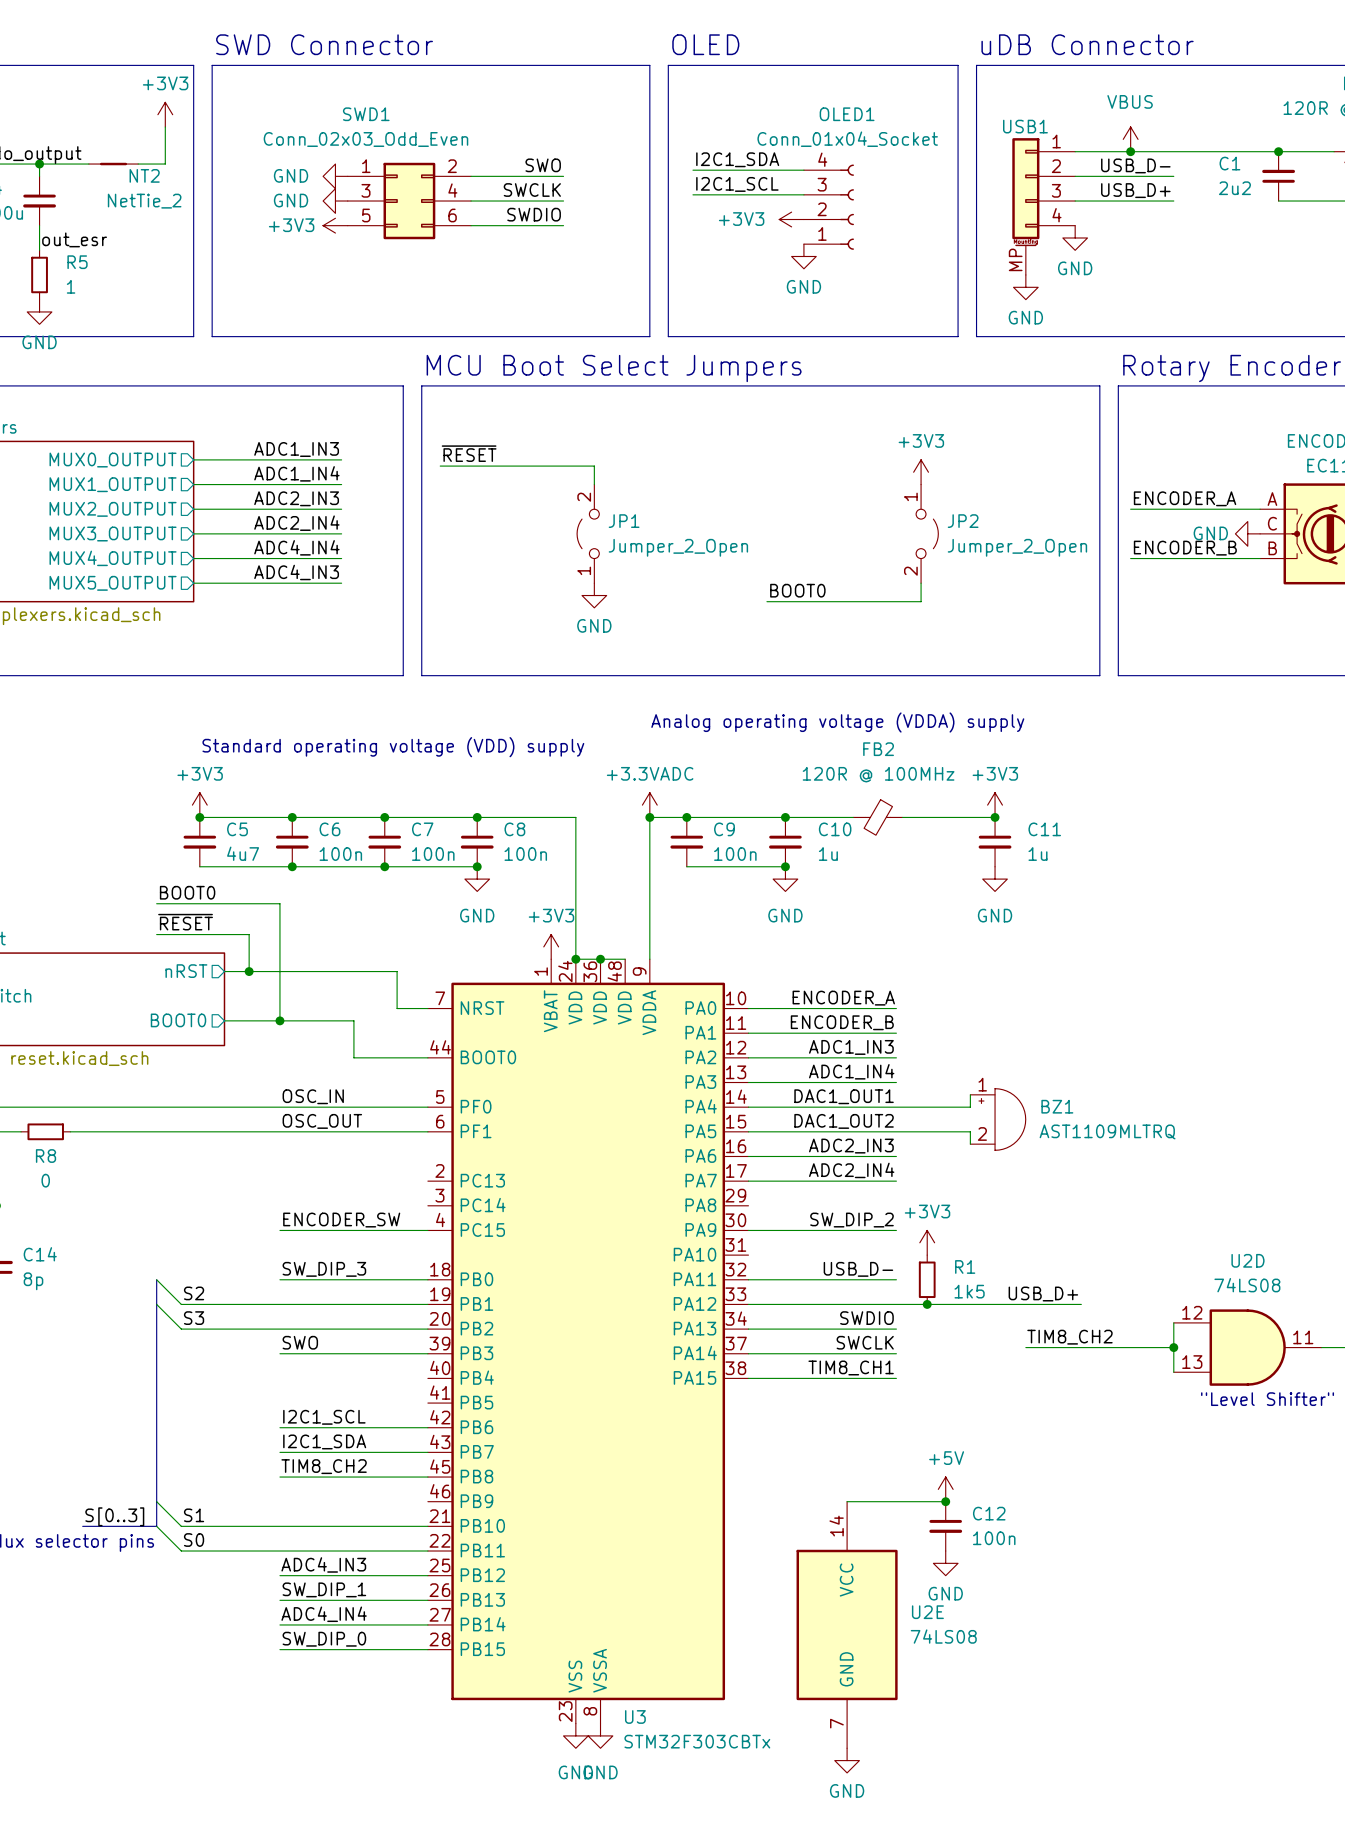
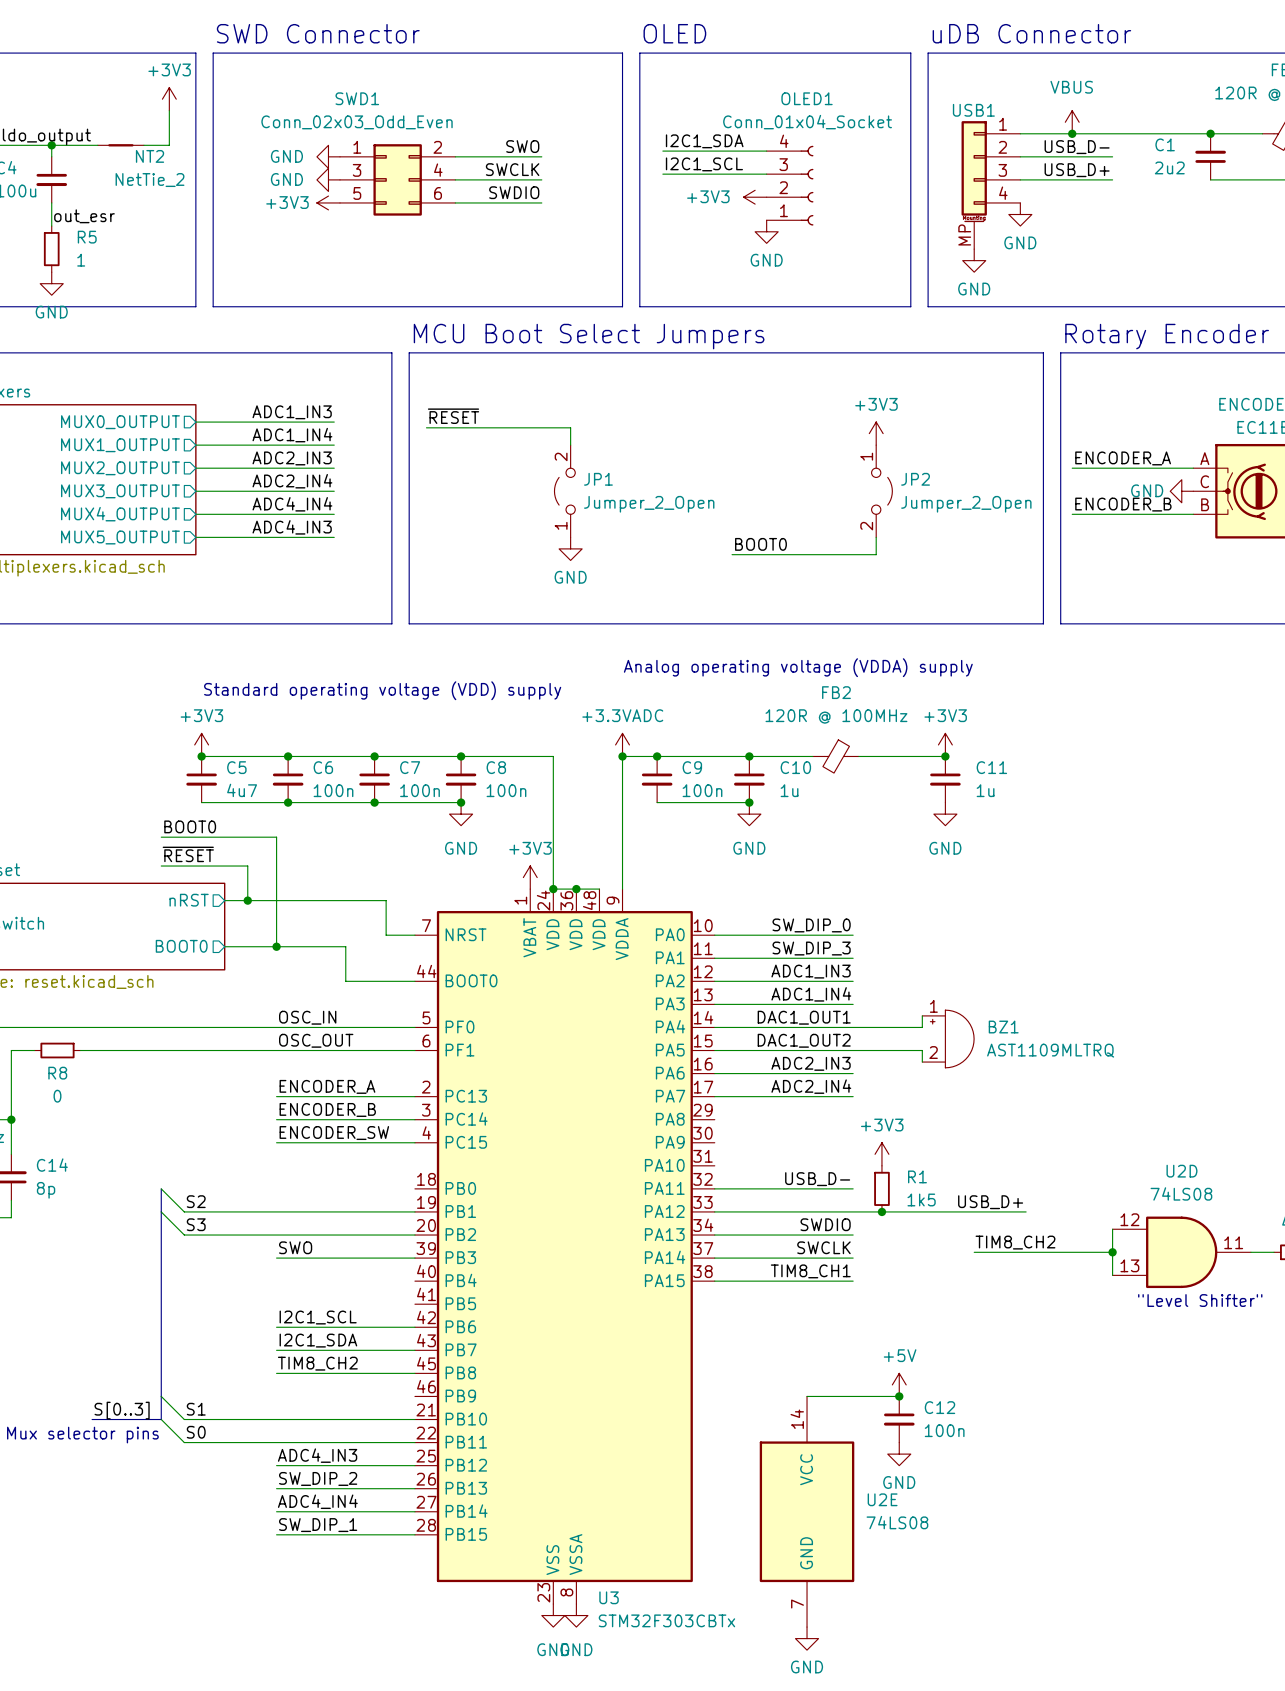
label: ENCODER_A (843, 998) -> SW_DIP_0 (811, 925)
label: ENCODER_B (842, 1022) -> SW_DIP_3 (811, 948)
label: none -> ENCODER_A (327, 1086)
wire: none -> (276, 1096) (414, 1096)
label: none -> ENCODER_B (327, 1109)
label: SW_DIP_2 (851, 1220) -> none
wire: (748, 1230) (896, 1230) -> none
label: SW_DIP_3 (324, 1269) -> none
wire: (279, 1279) (427, 1279) -> (276, 1119) (414, 1119)
label: SW_DIP_1 (324, 1589) -> SW_DIP_2 (318, 1478)
label: SW_DIP_0 (324, 1639) -> SW_DIP_1 (318, 1525)

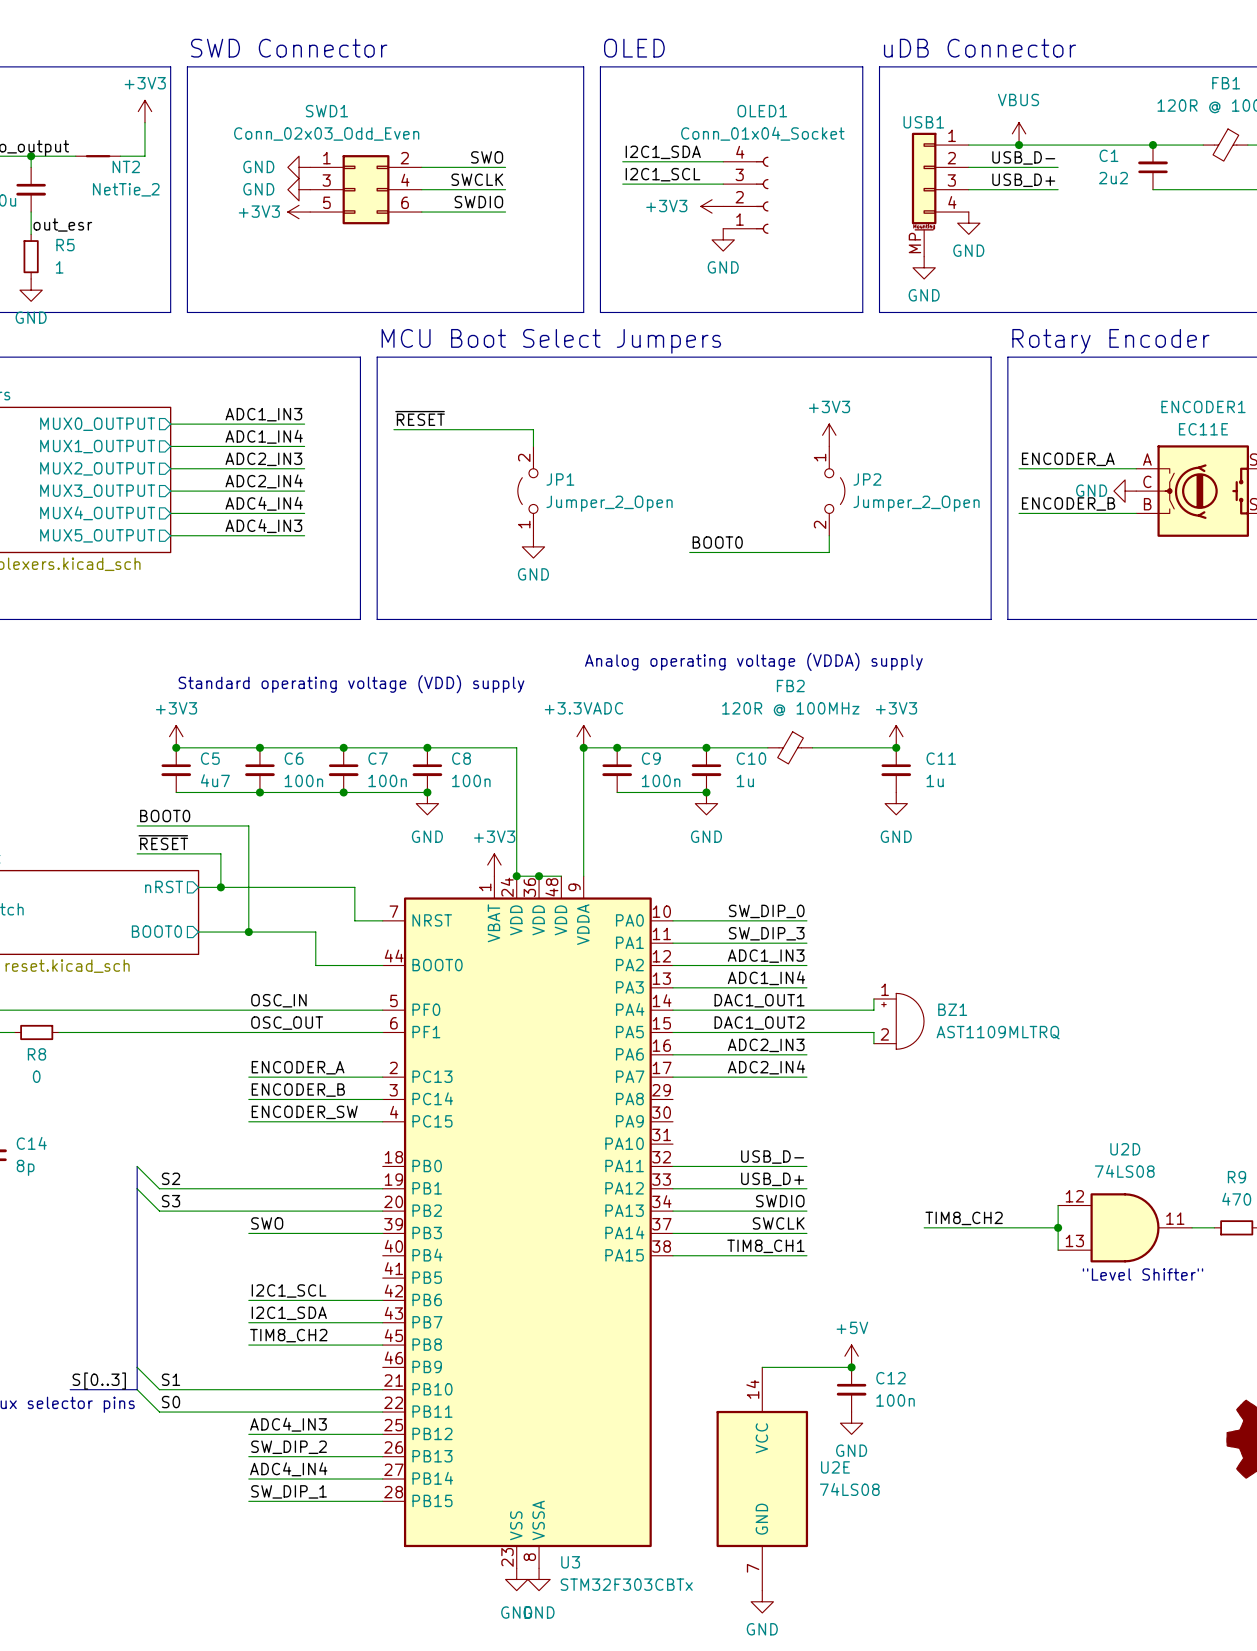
power symbol: +3V3 (881, 1154) -> none
R1: 1k5 (881, 1188) -> none
label position: USB_D+ (990, 1202) -> USB_D+ (772, 1179)
wire: (853, 1211) (1026, 1211) -> none
junction: (881, 1211) -> none

